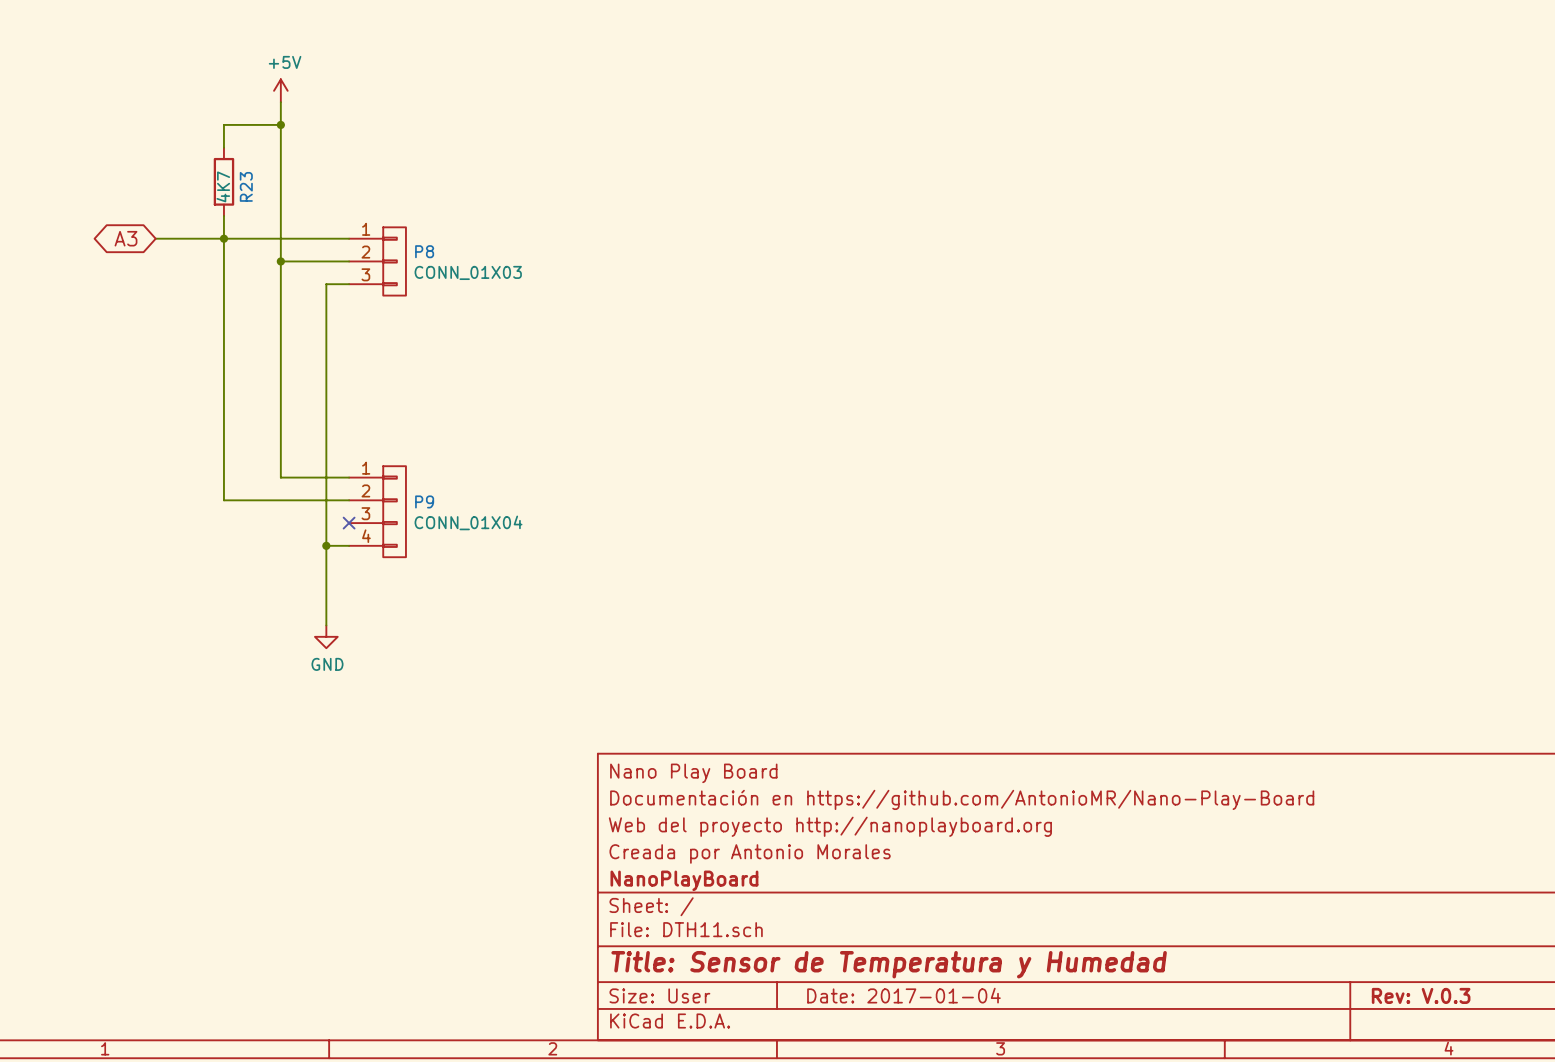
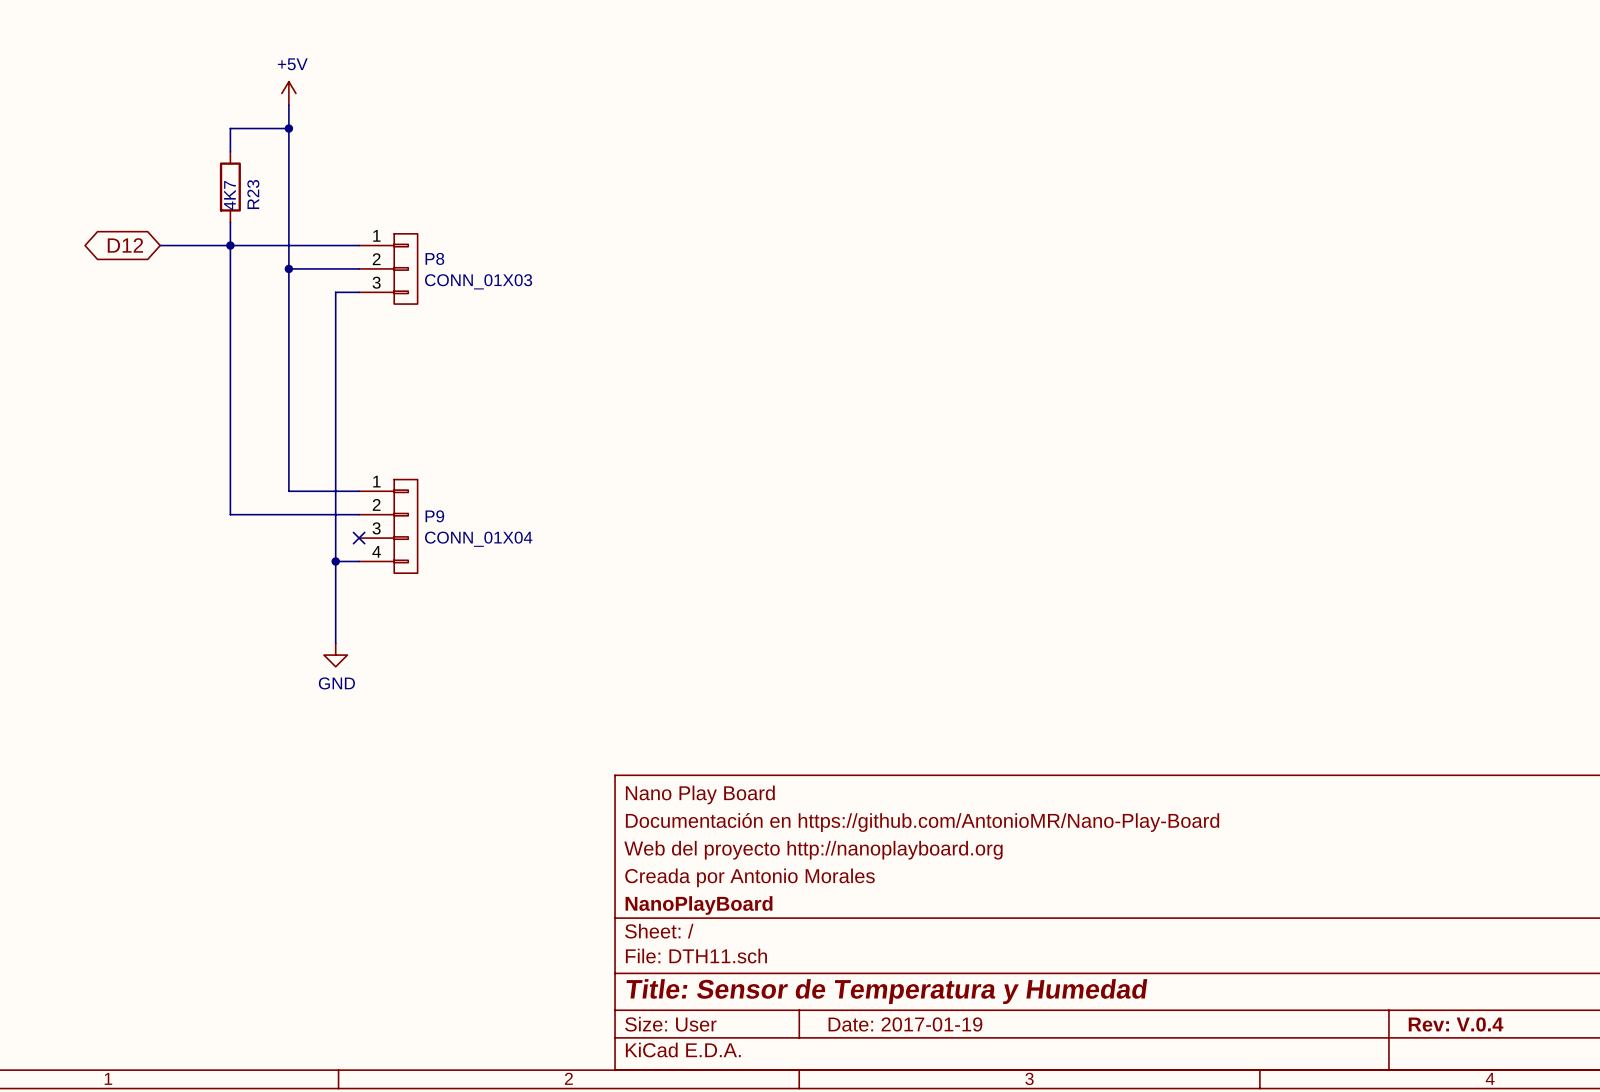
global label: A3 (125, 238) -> D12 (125, 245)
title block: Date: 2017-01-04 (903, 995) -> Date: 2017-01-19 (905, 1024)
title block: Rev: V.0.3 (1421, 995) -> Rev: V.0.4 (1456, 1024)

